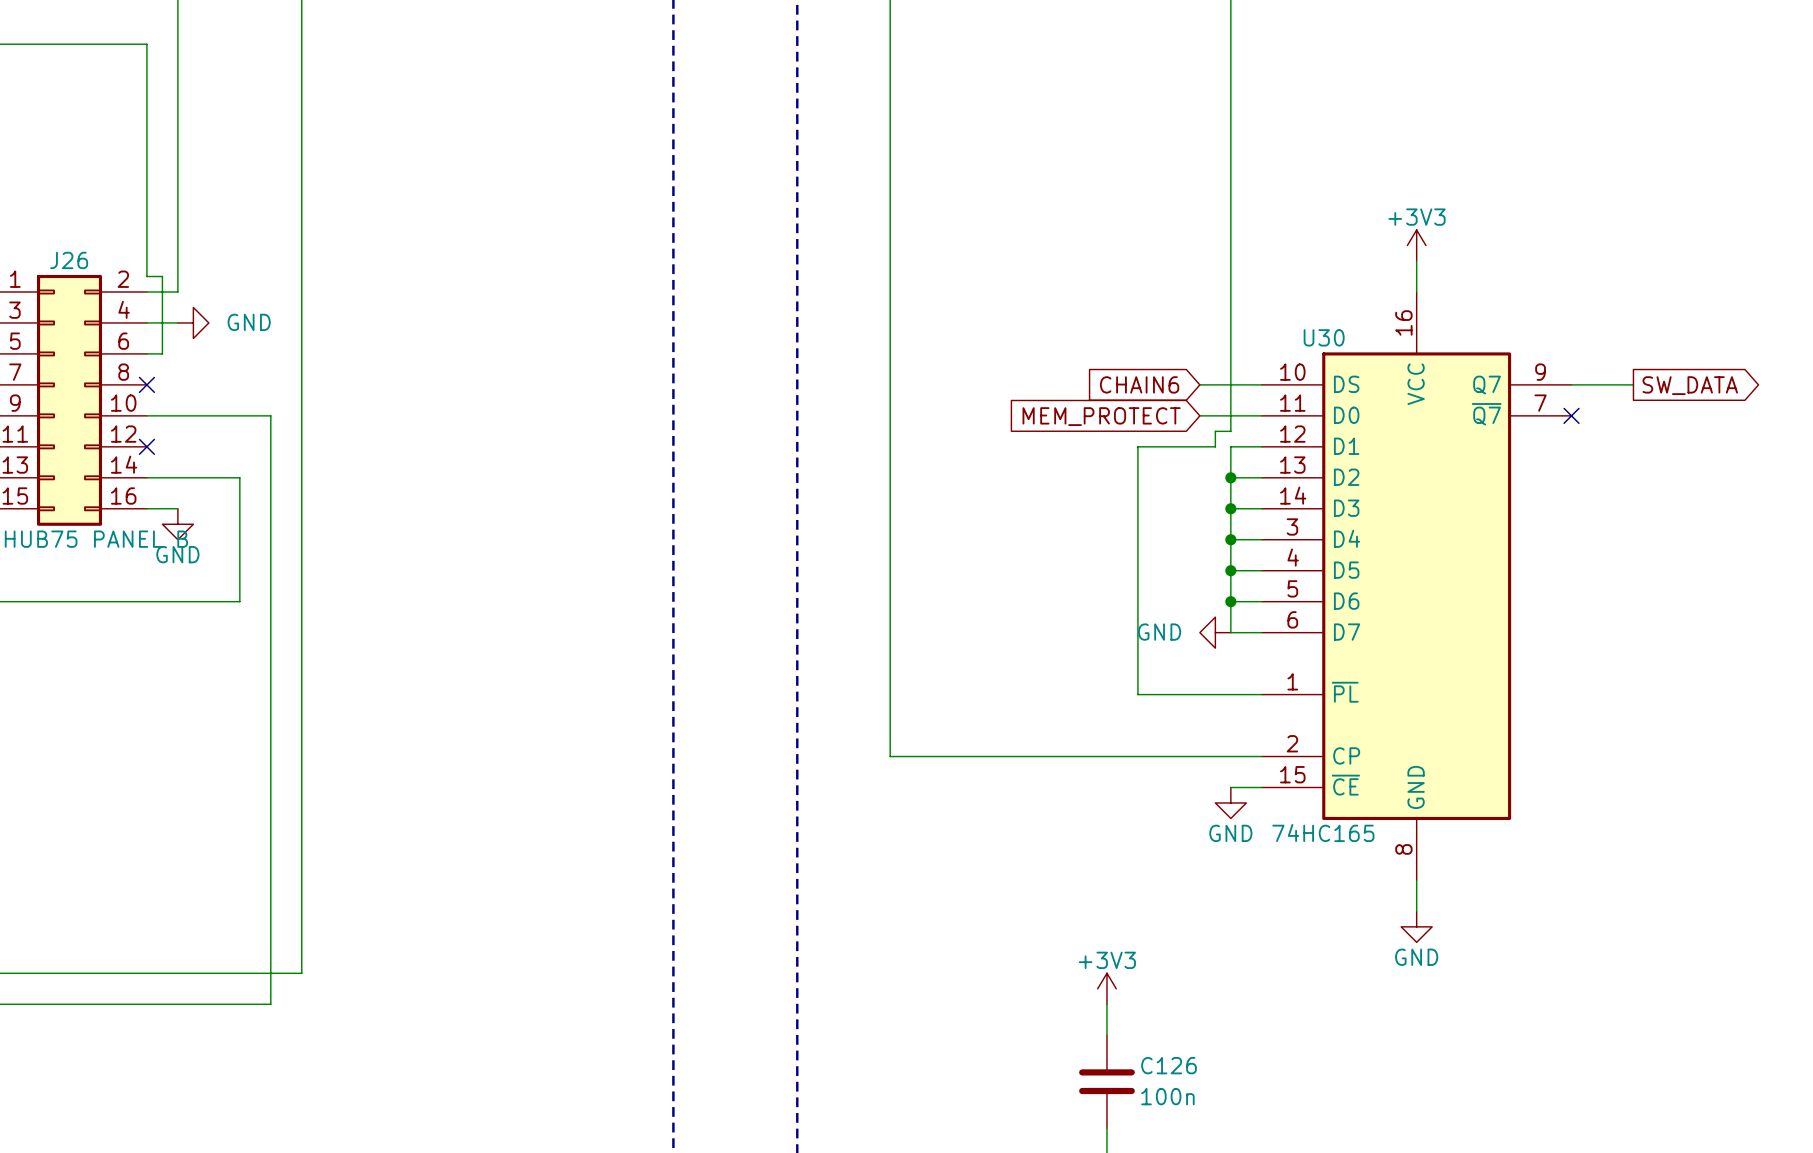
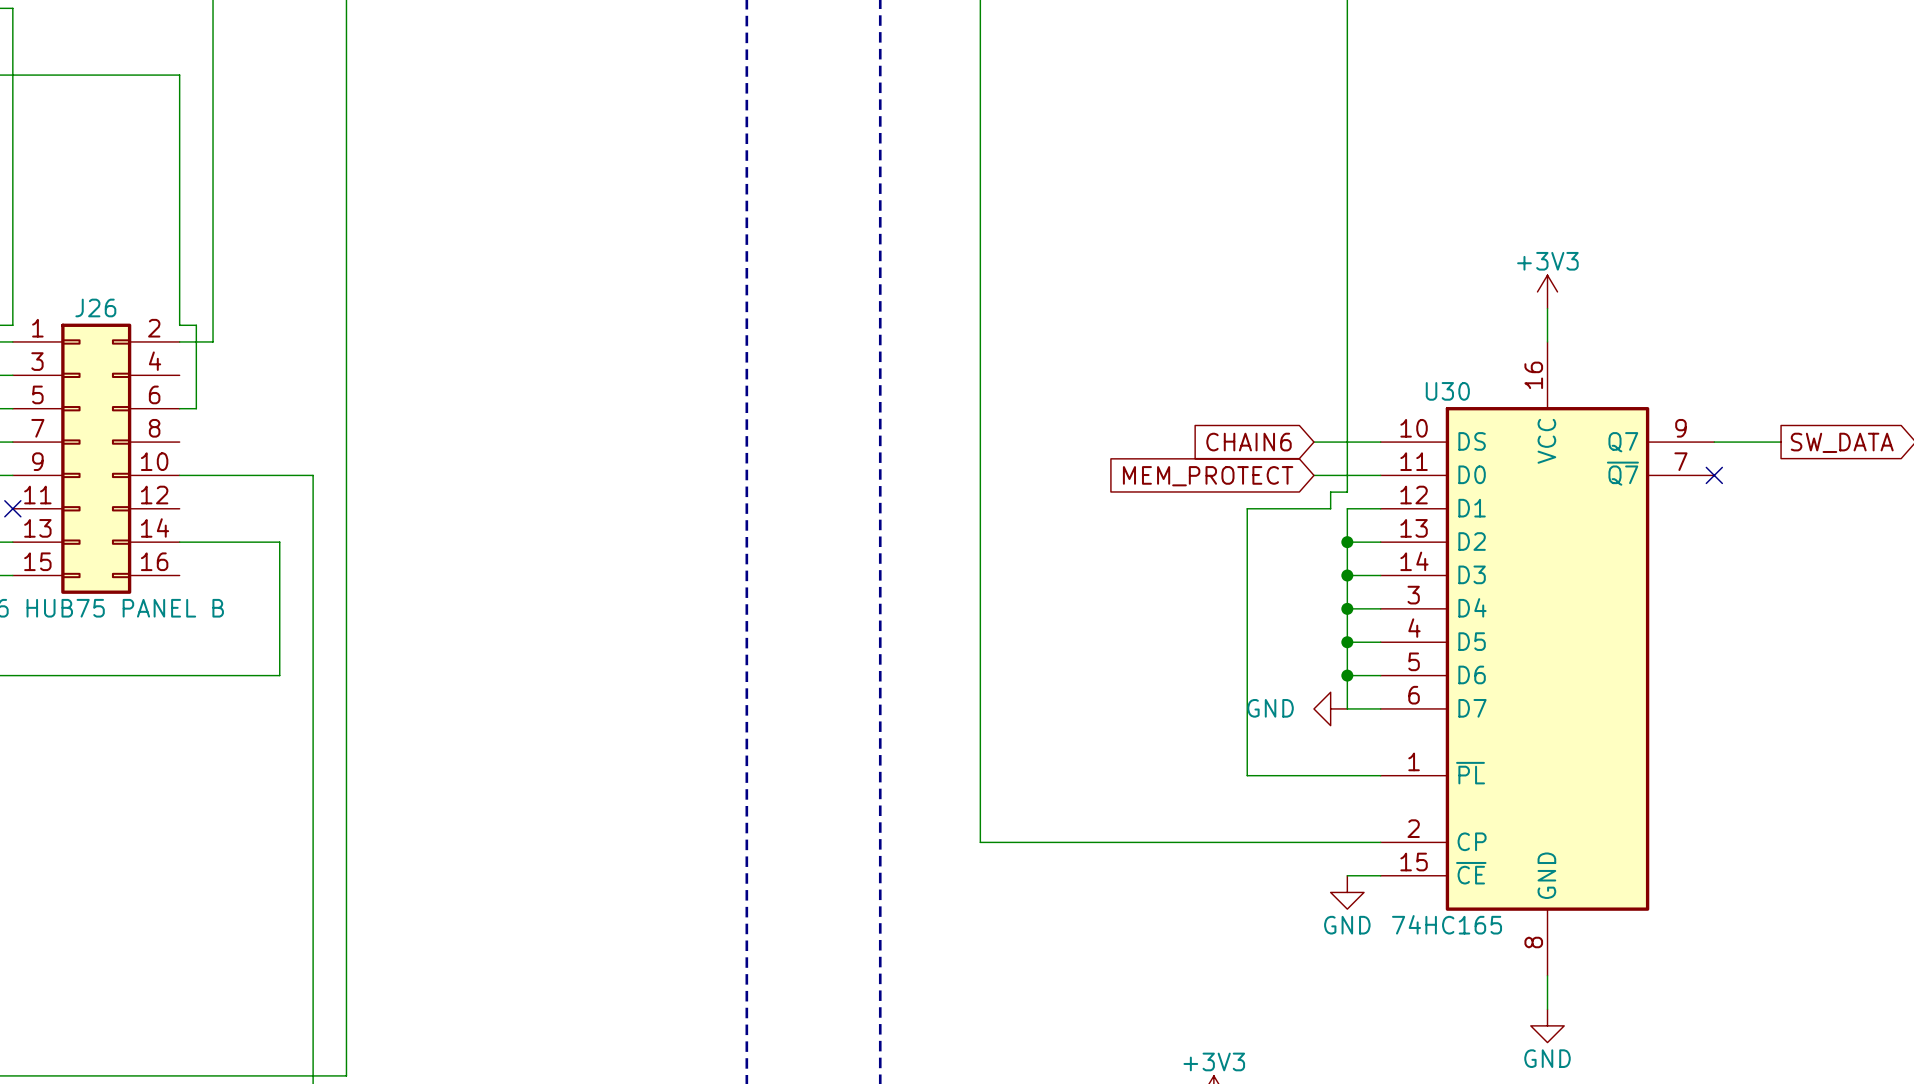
wire: (146, 322) (177, 322) -> none
power symbol: GND (193, 322) -> none
no-connect mark: (146, 384) -> none
no-connect mark: (146, 446) -> none
wire: (146, 508) (177, 508) -> none
power symbol: GND (177, 524) -> none

